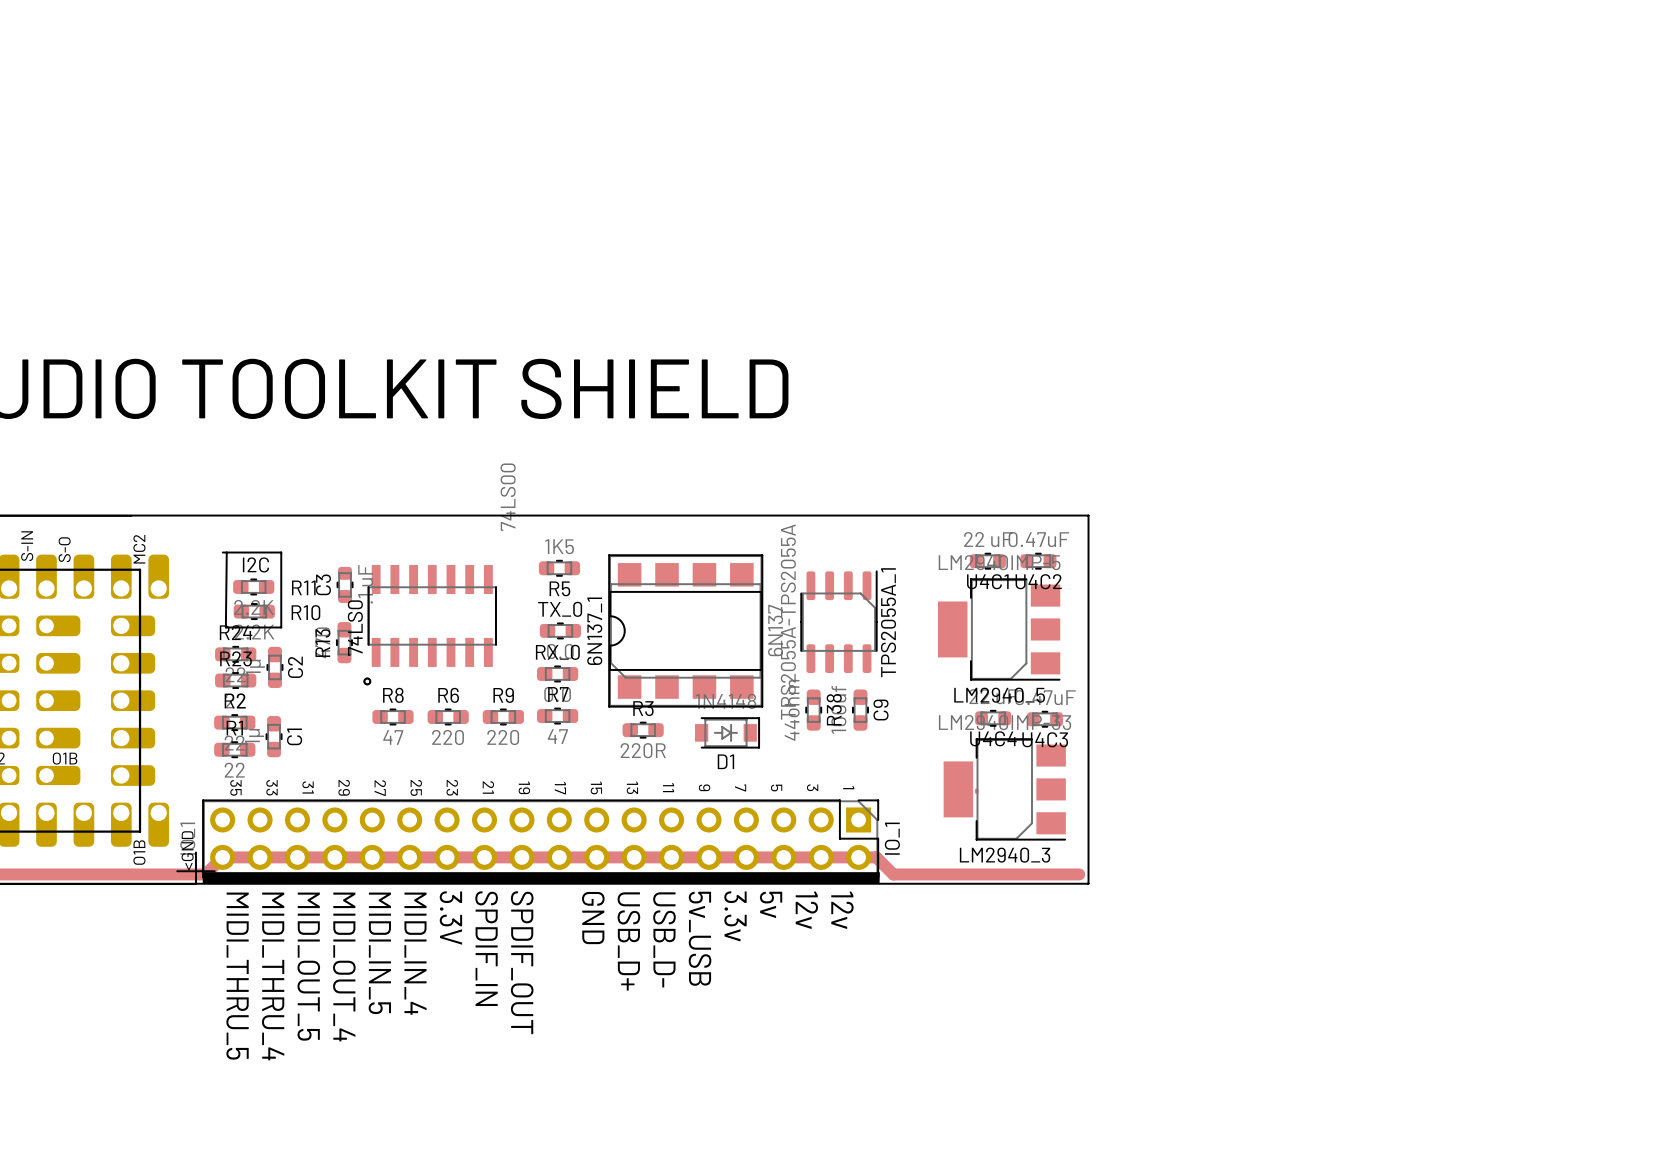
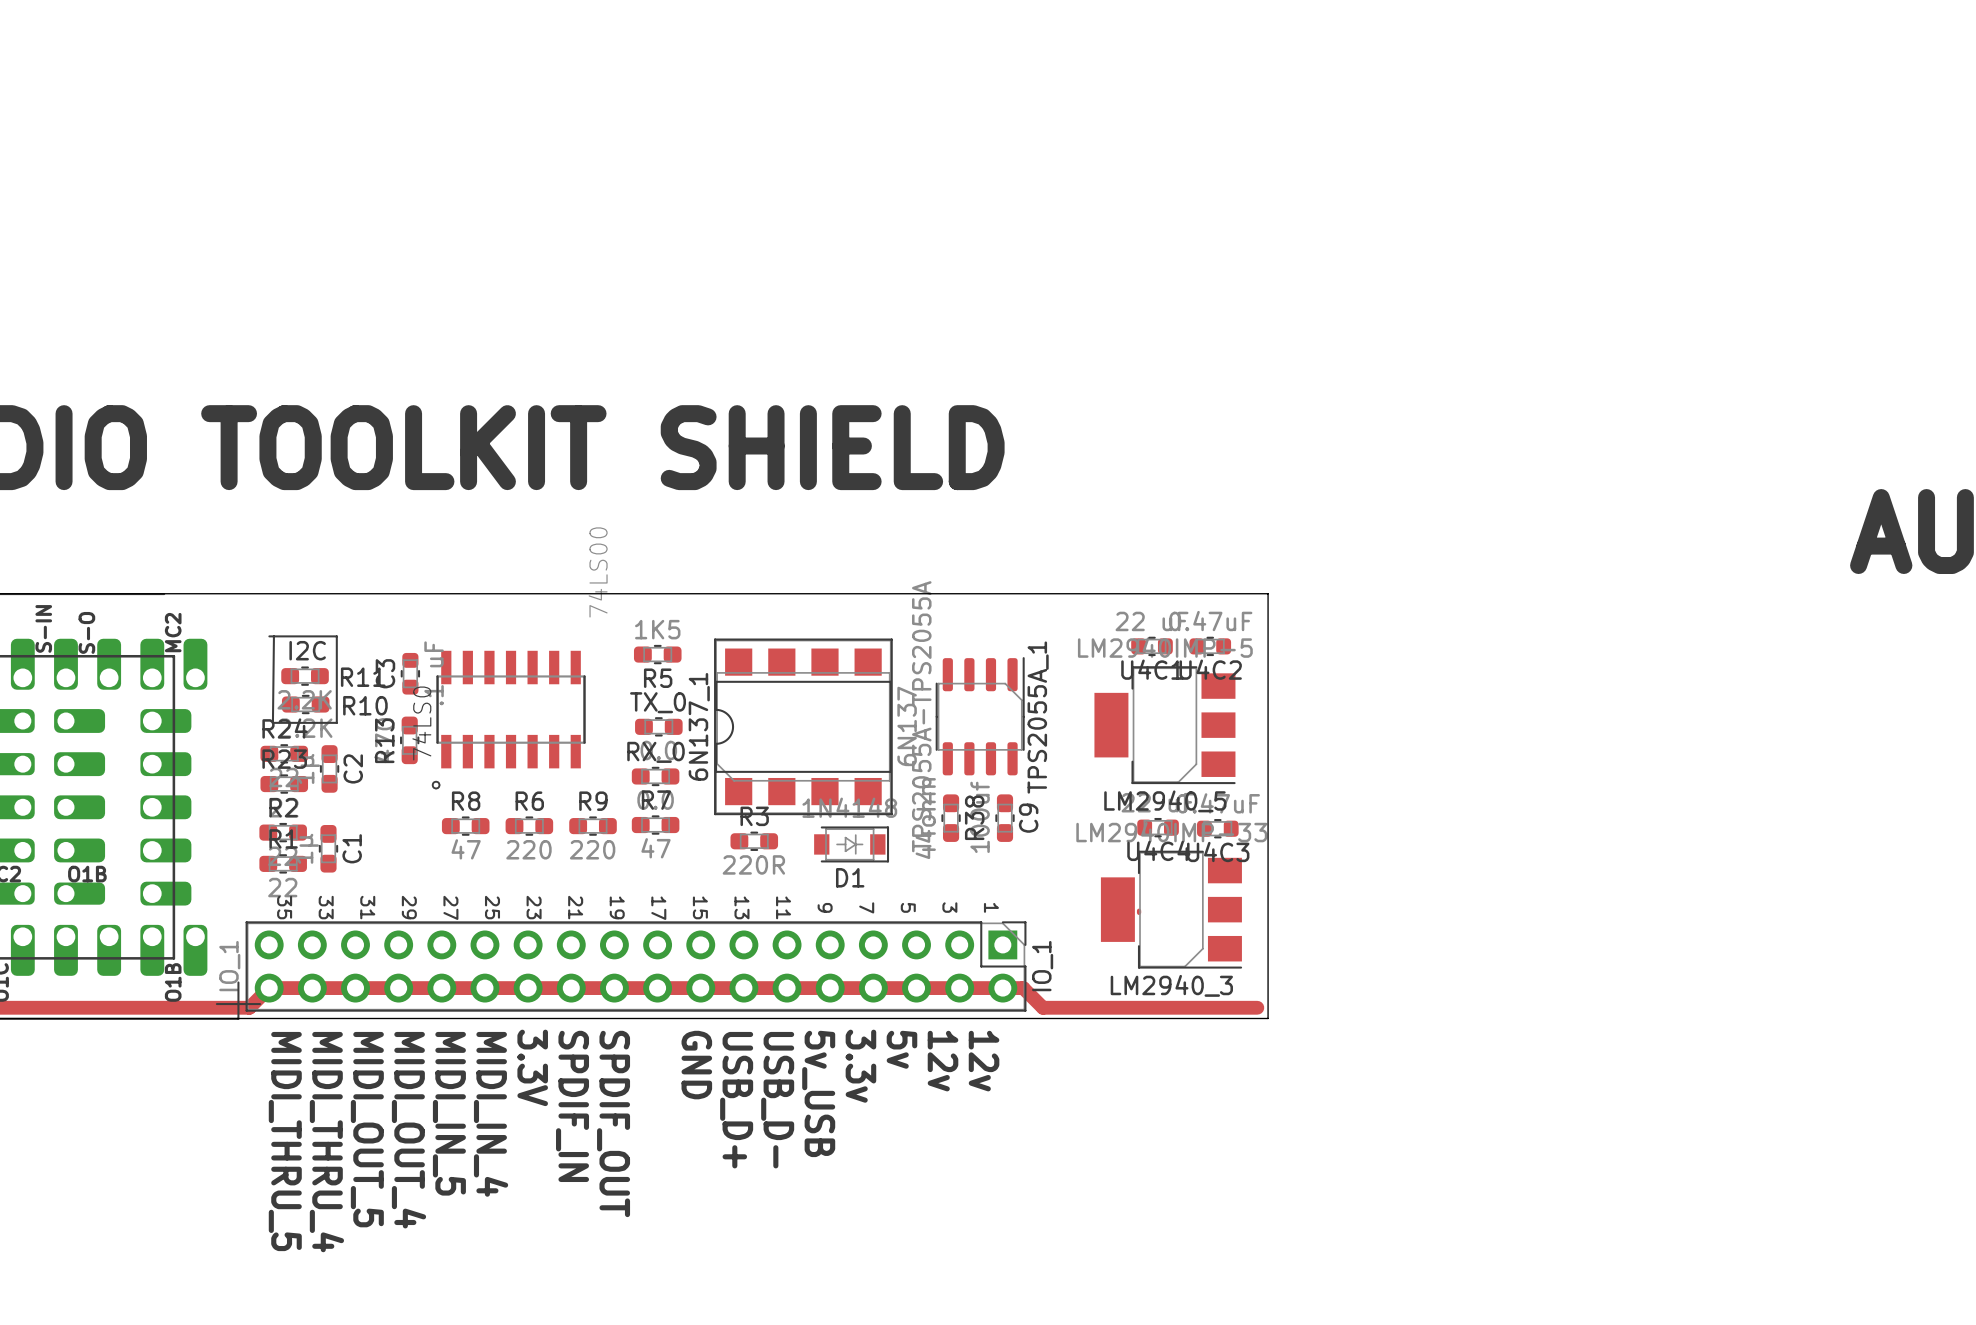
text: <GND (187, 850) -> none
drawing: [202, 871, 880, 885] -> none

